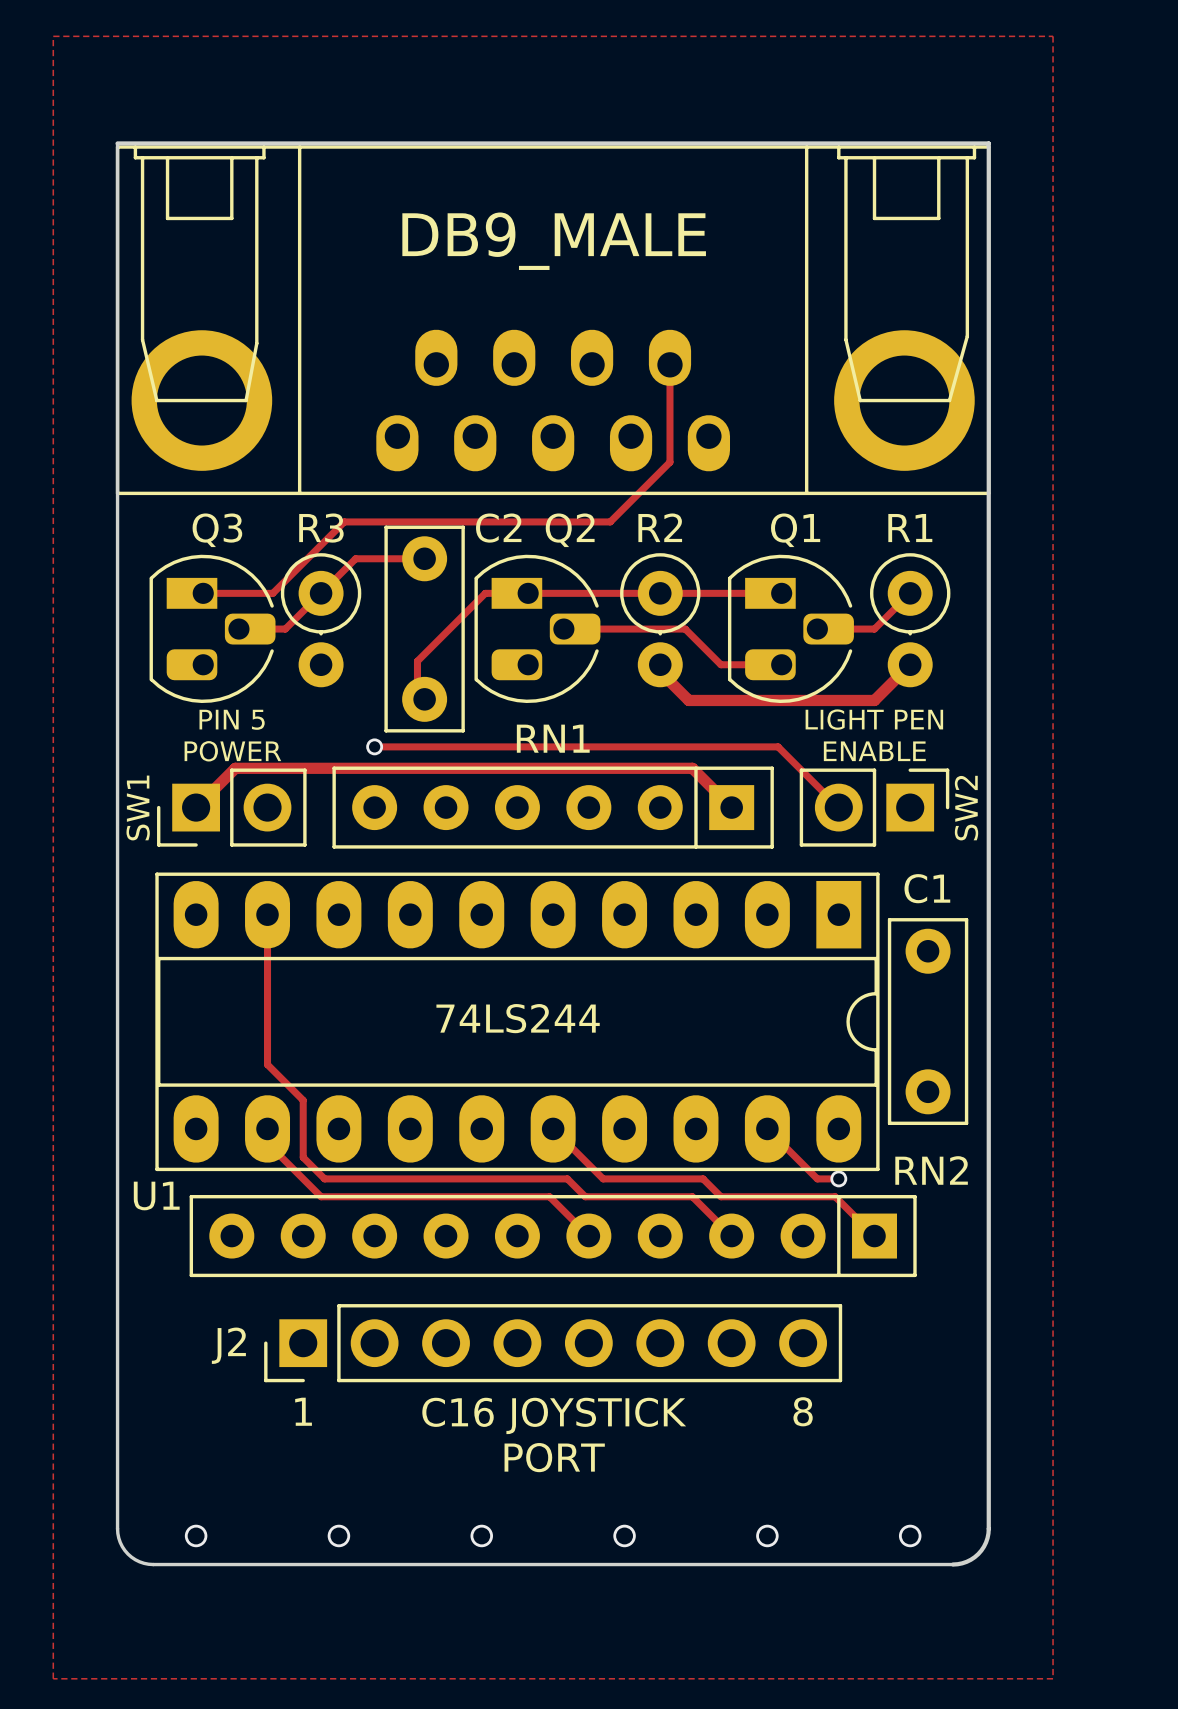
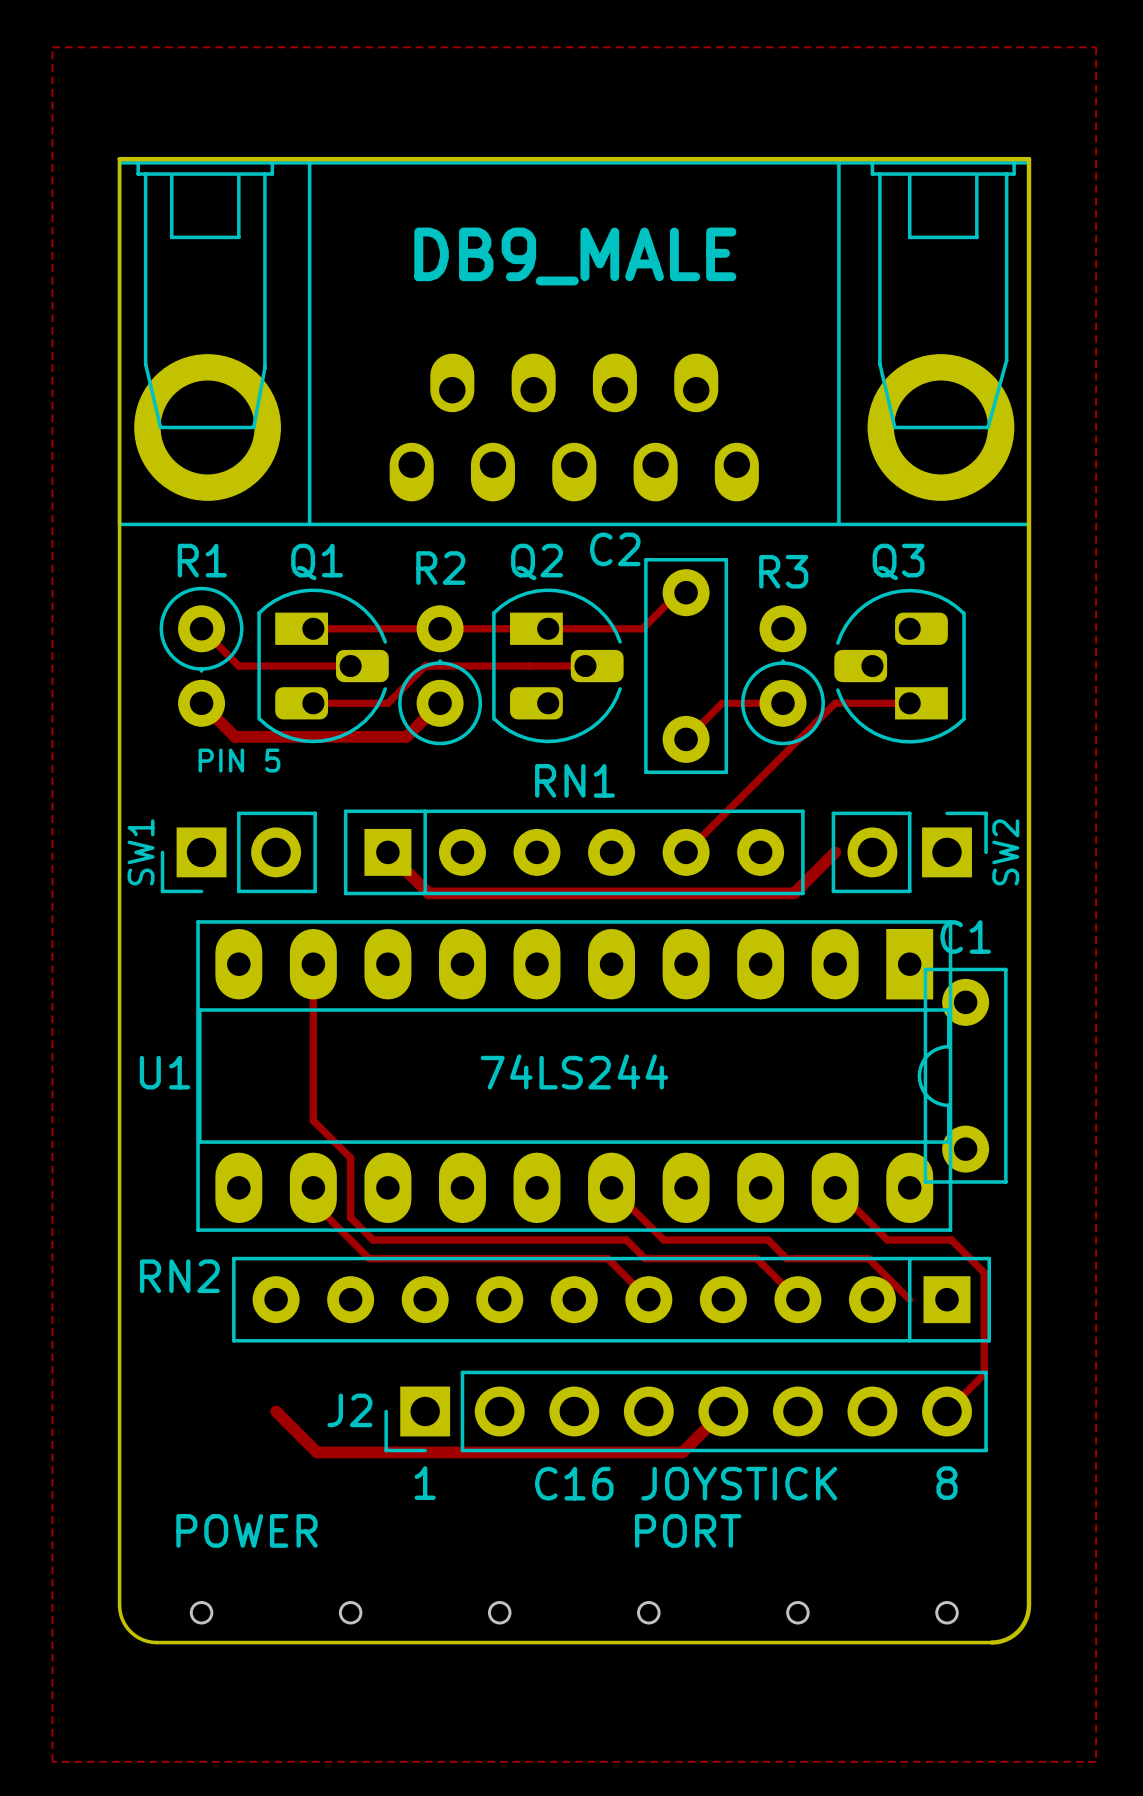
track: (669, 364) (669, 462) (610, 521) (344, 521) (272, 593) (203, 593) -> none
C2 name position: C2 (498, 528) -> C2 (615, 549)
Q2 name position: Q2 (570, 530) -> Q2 (537, 561)
Q1 name position: Q1 (795, 530) -> Q1 (317, 561)
track: (413, 558) (355, 558) (285, 629) -> (350, 666) (294, 666)
track: none -> (201, 628) (238, 666) (246, 666)
track: (485, 593) (417, 661) (417, 699) -> (503, 628) (313, 628)
track: (618, 593) (760, 593) -> (642, 628) (678, 592)
track: (910, 593) (874, 629) (838, 629) -> none
R3 rotation: 0° (321, 620) -> 180° (783, 675)
R3 position: (321, 620) -> (783, 675)
R2 rotation: 0° (660, 620) -> 180° (440, 675)
R2 position: (660, 620) -> (440, 675)
R1 position: (910, 620) -> (201, 656)
Q3 rotation: 0° (212, 628) -> 180° (900, 666)
Q3 position: (212, 628) -> (900, 666)
Q1 position: (790, 628) -> (323, 665)
C2 position: (424, 629) -> (686, 666)
track: none -> (585, 666) (425, 666) (387, 703) (313, 703)
track: (567, 629) (685, 629) (720, 664) -> (686, 739) (722, 703) (749, 703)
track: none -> (201, 703) (235, 736) (406, 736) (440, 703)
track: (653, 664) (688, 700) (874, 700) (910, 664) -> none
track: none -> (909, 703) (835, 703) (686, 852)
text: LIGHT PEN (874, 719) -> none
track: (374, 746) (778, 746) (838, 807) -> none
via: (374, 746) -> none
text: POWER (232, 751) -> none
text: ENABLE (874, 751) -> none
track: (196, 807) (235, 768) (692, 768) (731, 807) -> none
track: none -> (387, 852) (428, 893) (794, 893) (835, 852)
RN1 rotation: 0° (553, 807) -> 180° (574, 852)
track: (267, 914) (267, 1064) (303, 1100) (303, 1128) -> none
track: none -> (313, 964) (313, 1120) (350, 1158) (350, 1217) (373, 1240)
U1 position: (517, 1021) -> (574, 1076)
track: (267, 1128) (267, 1143) (321, 1196) (356, 1196) -> none
track: (553, 1128) (603, 1178) (638, 1178) -> (611, 1187) (663, 1240)
track: (767, 1128) (817, 1178) (838, 1178) -> none
track: none -> (835, 1187) (887, 1240) (951, 1240) (984, 1272) (984, 1374) (947, 1411)
track: (303, 1143) (303, 1157) (324, 1178) (360, 1178) -> (313, 1202) (369, 1258)
RN2 name position: RN2 (931, 1170) -> RN2 (179, 1276)
track: (567, 1178) (585, 1196) (621, 1196) -> (589, 1240) (626, 1240) (645, 1258)
track: (703, 1178) (720, 1196) -> (719, 1258) (749, 1258)
via: (838, 1178) -> none
U1 name position: U1 (156, 1195) -> U1 (164, 1072)
track: (549, 1196) (588, 1236) -> (570, 1258) (607, 1258) (648, 1299)
track: (692, 1196) (731, 1236) -> (756, 1258) (797, 1299)
track: (728, 1196) (756, 1196) -> (730, 1240) (768, 1240) (786, 1258)
RN2 position: (553, 1236) -> (611, 1299)
track: none -> (276, 1411) (317, 1452) (682, 1452) (723, 1411)
J2 position: (553, 1343) -> (686, 1411)
text position: 1 (303, 1411) -> 1 (425, 1483)
text position: 8 (803, 1411) -> 8 (947, 1483)
text position: C16 JOYSTICK (554, 1415) -> C16 JOYSTICK (686, 1483)
text: none -> POWER (246, 1530)
text position: PORT (554, 1457) -> PORT (688, 1530)

